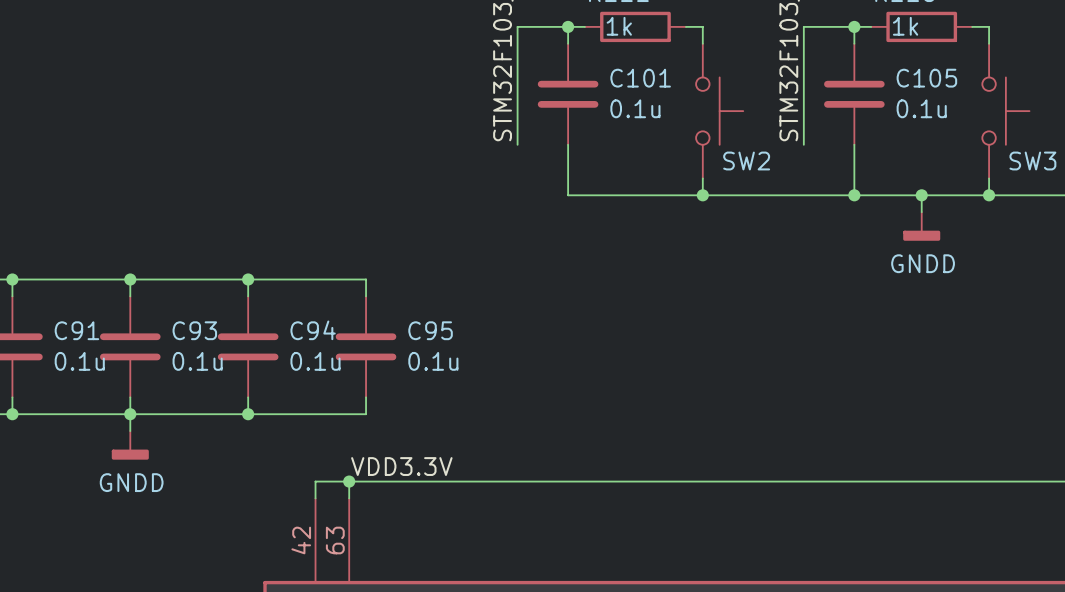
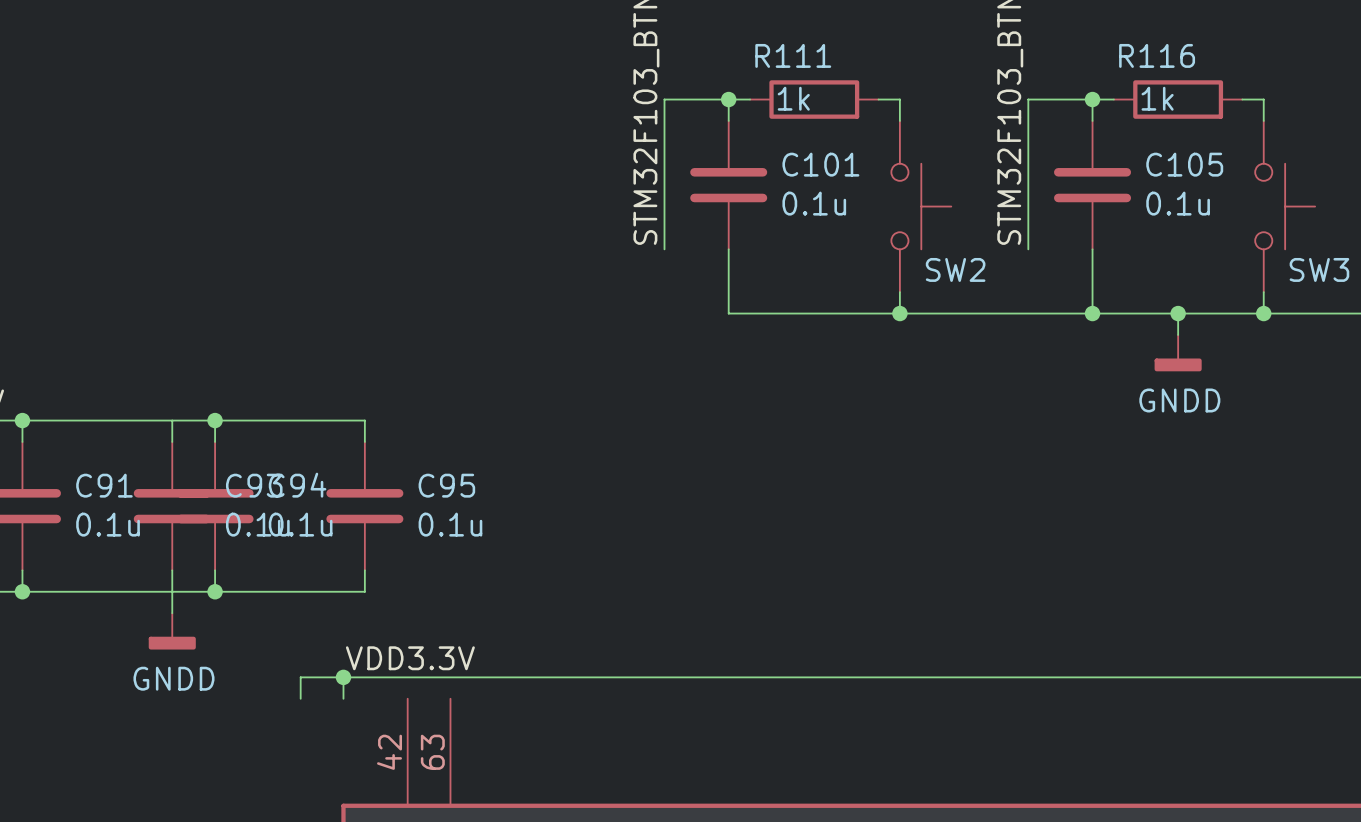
junction position: (130, 279) -> (215, 420)
wire: (248, 279) (248, 296) -> (215, 420) (215, 441)
junction: (248, 279) -> none
wire: (281, 279) (366, 279) (366, 296) -> (364, 420) (364, 441)
C94 position: (248, 346) -> (215, 506)
C95 position: (366, 346) -> (364, 506)
wire: (248, 397) (248, 414) -> (215, 570) (215, 591)
wire: (366, 397) (366, 414) (281, 414) -> (364, 570) (364, 591)
junction position: (130, 414) -> (215, 591)
junction: (248, 414) -> none
label position: VDD3.3V (401, 466) -> VDD3.3V (410, 658)
junction: none -> (343, 677)
wire: (315, 481) (315, 498) -> (407, 677) (300, 677) (300, 698)
wire: (349, 481) (349, 498) -> (343, 677) (343, 698)
junction: (349, 481) -> none

